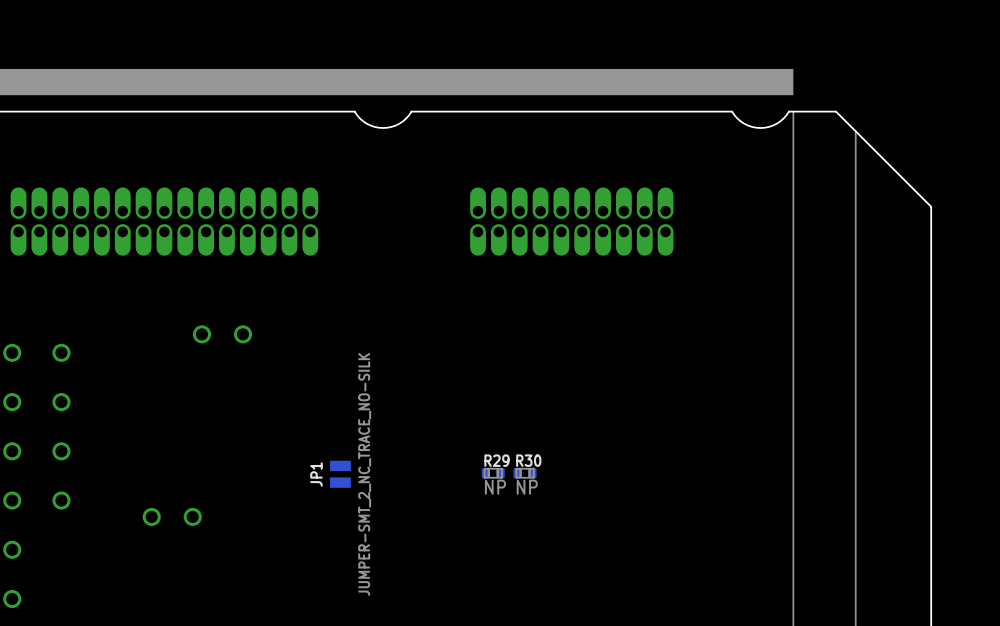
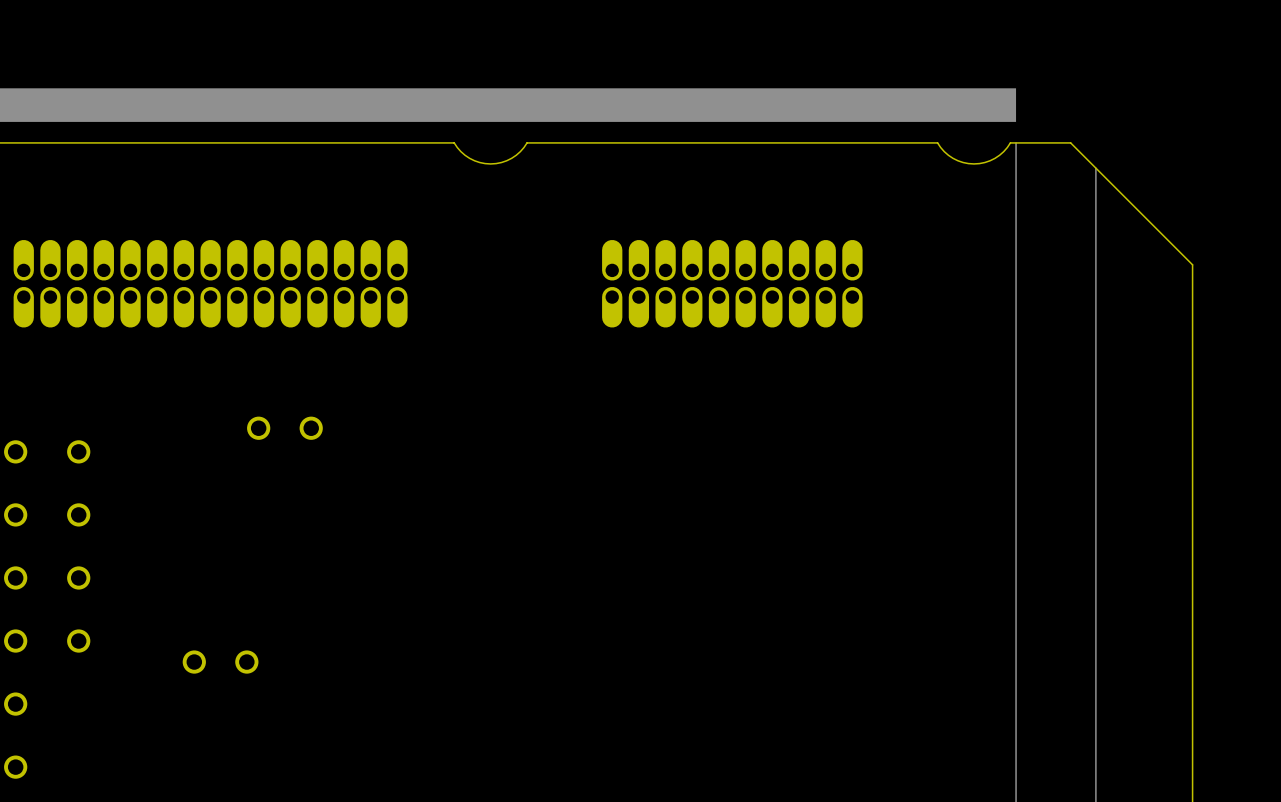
R29: NP (493, 473) -> none
R30: NP (525, 473) -> none
JP1: JUMPER-SMT_2_NC_TRACE_NO-SILK (340, 474) -> none

